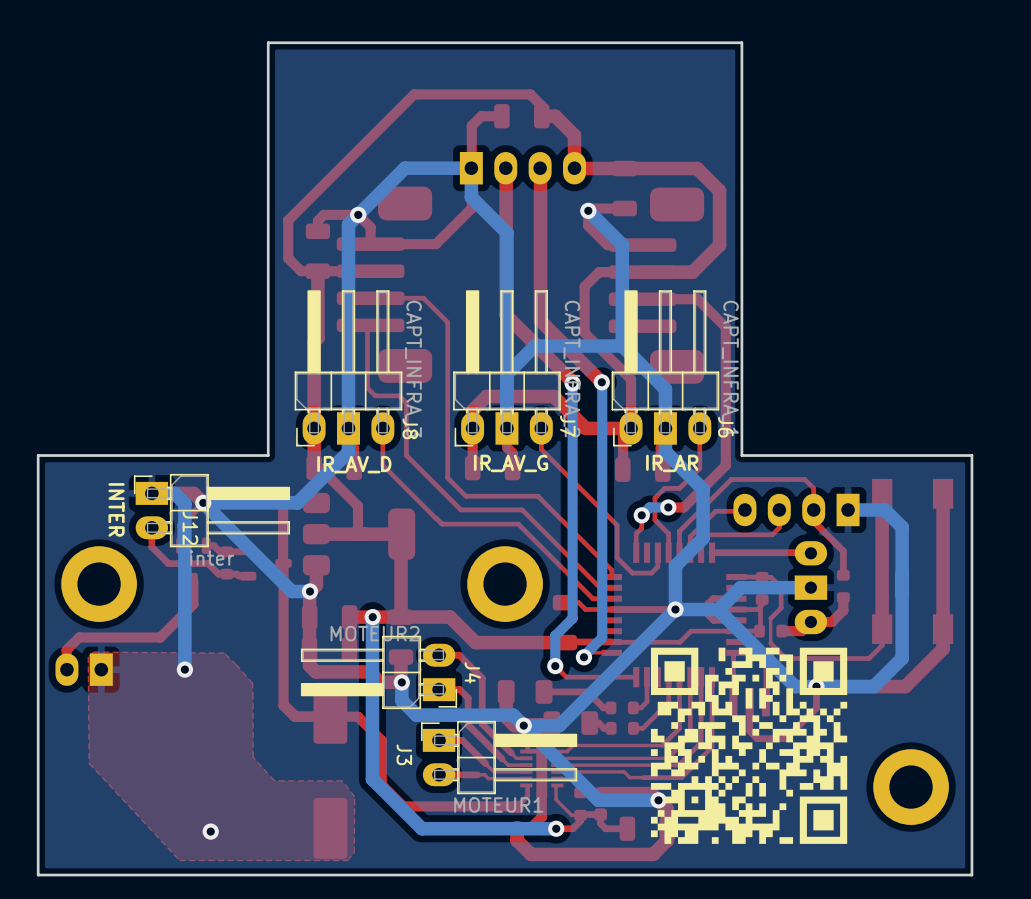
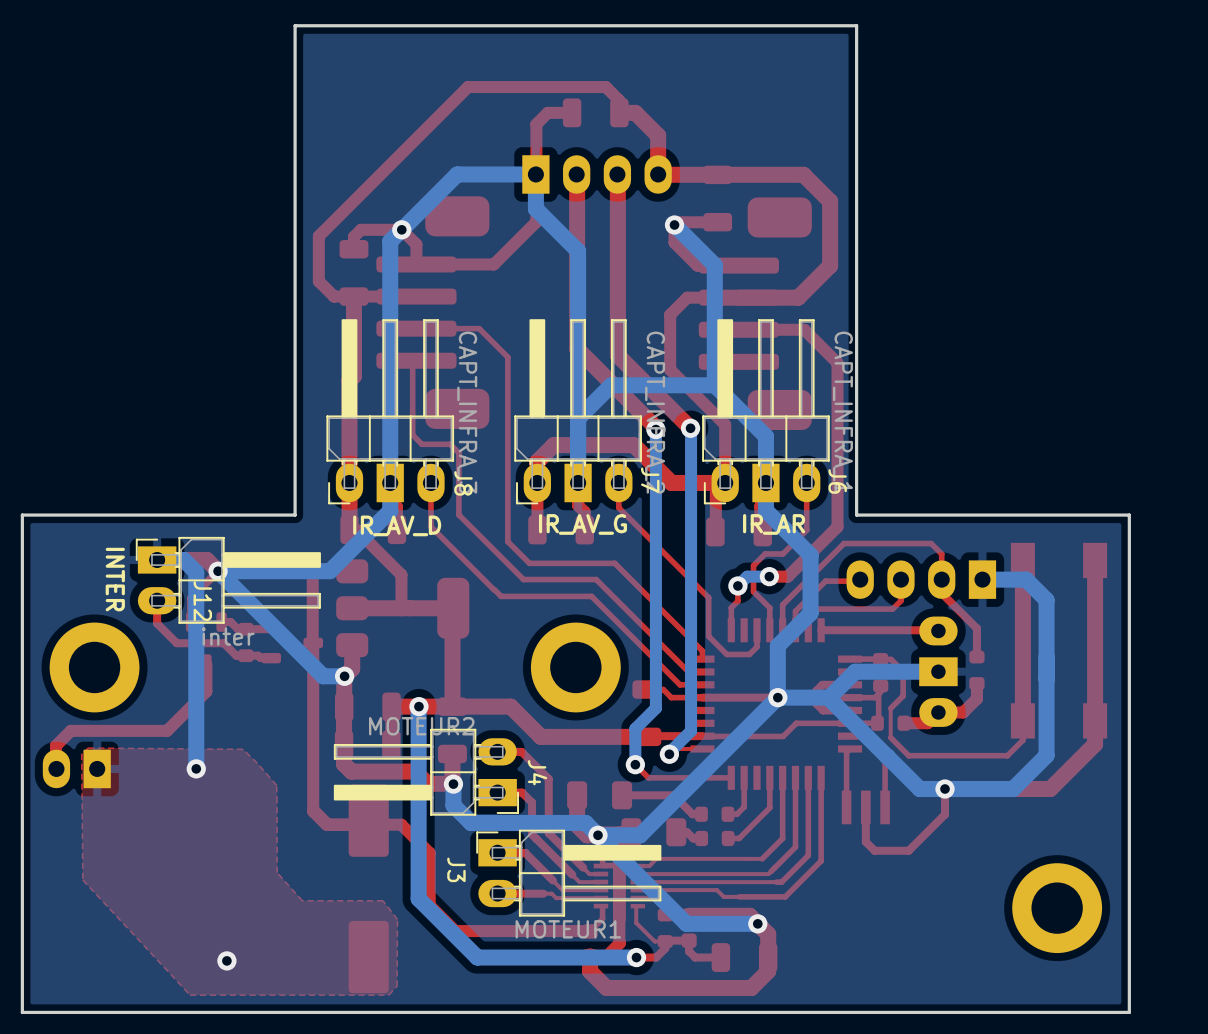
drawing: [650, 647, 848, 844] -> none

